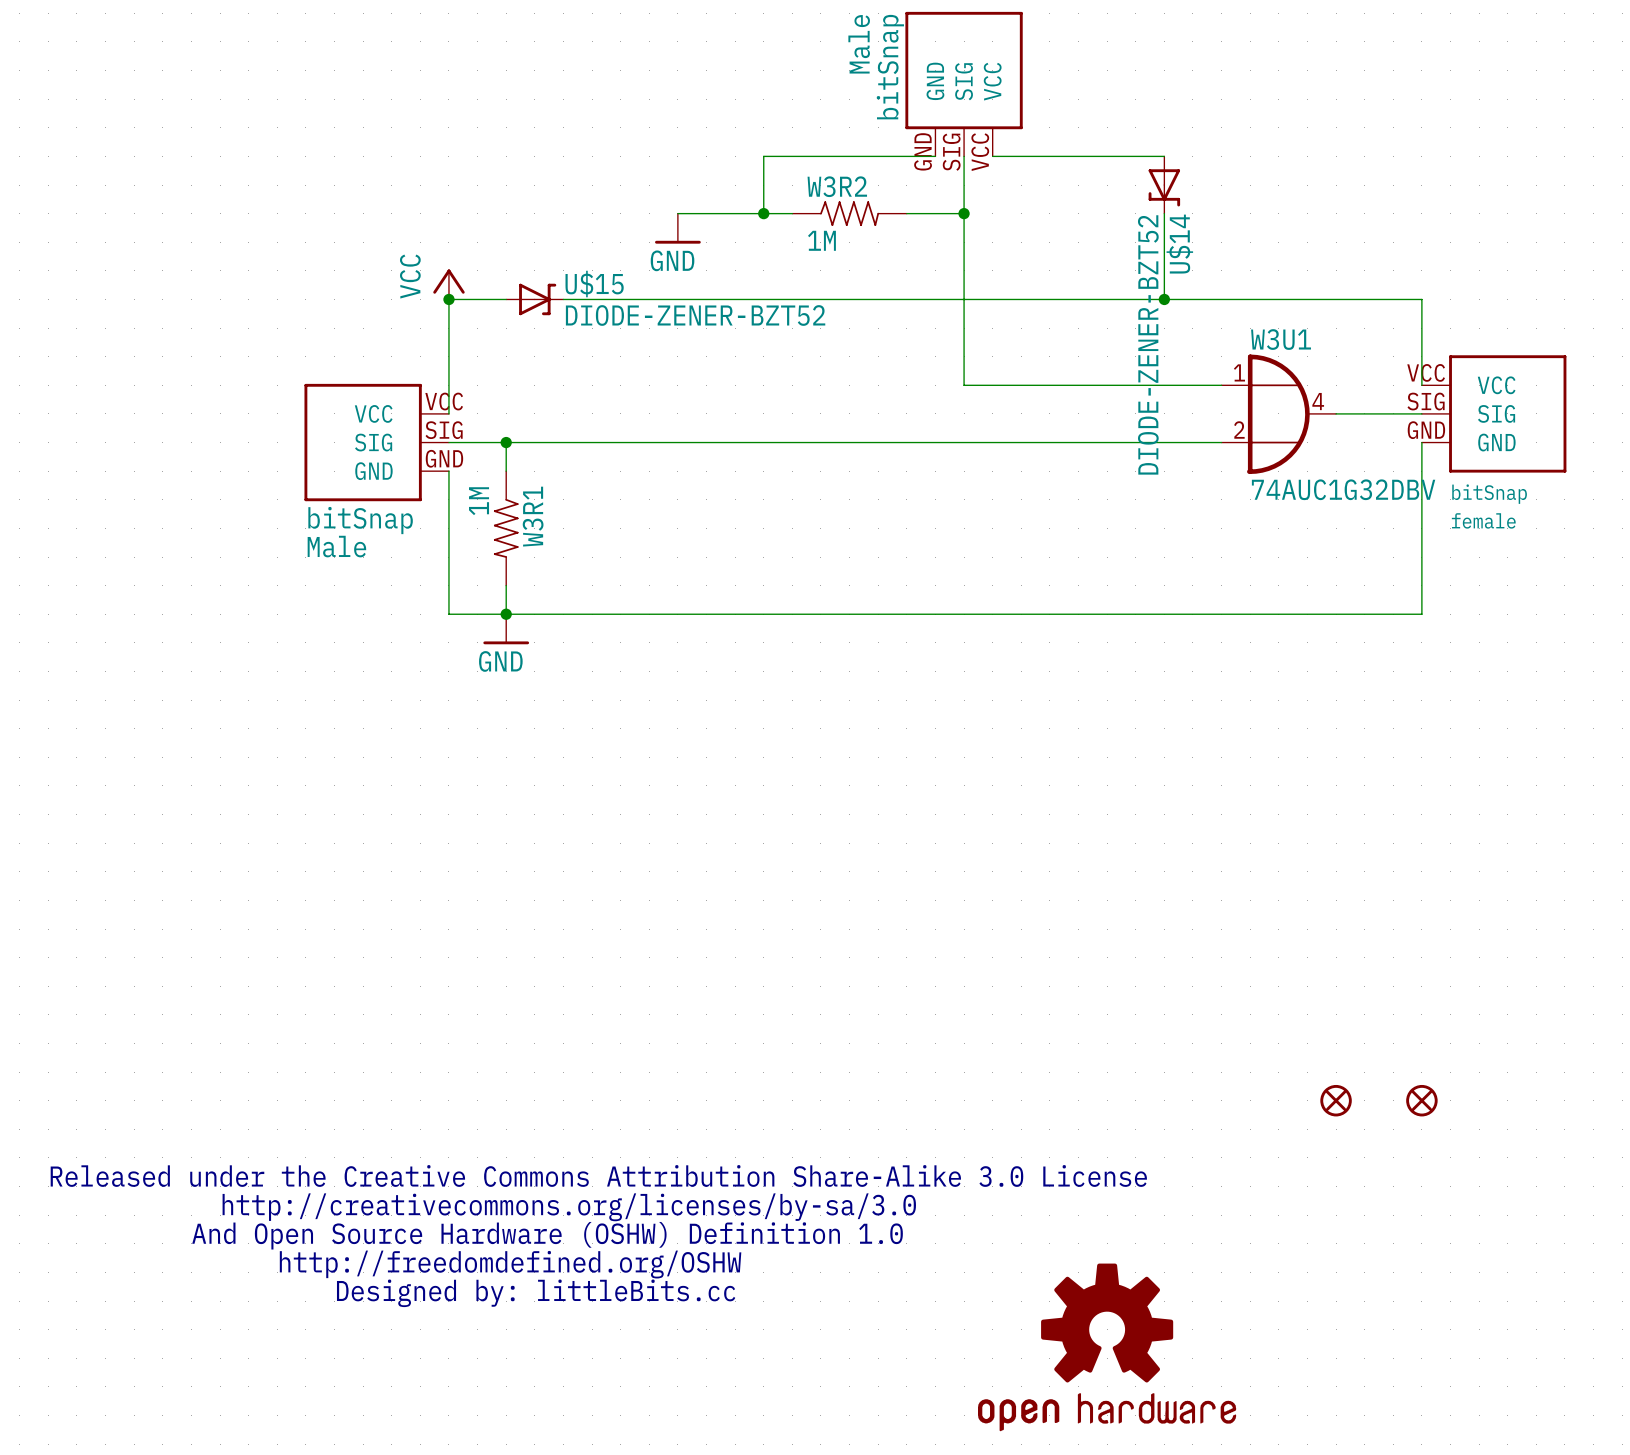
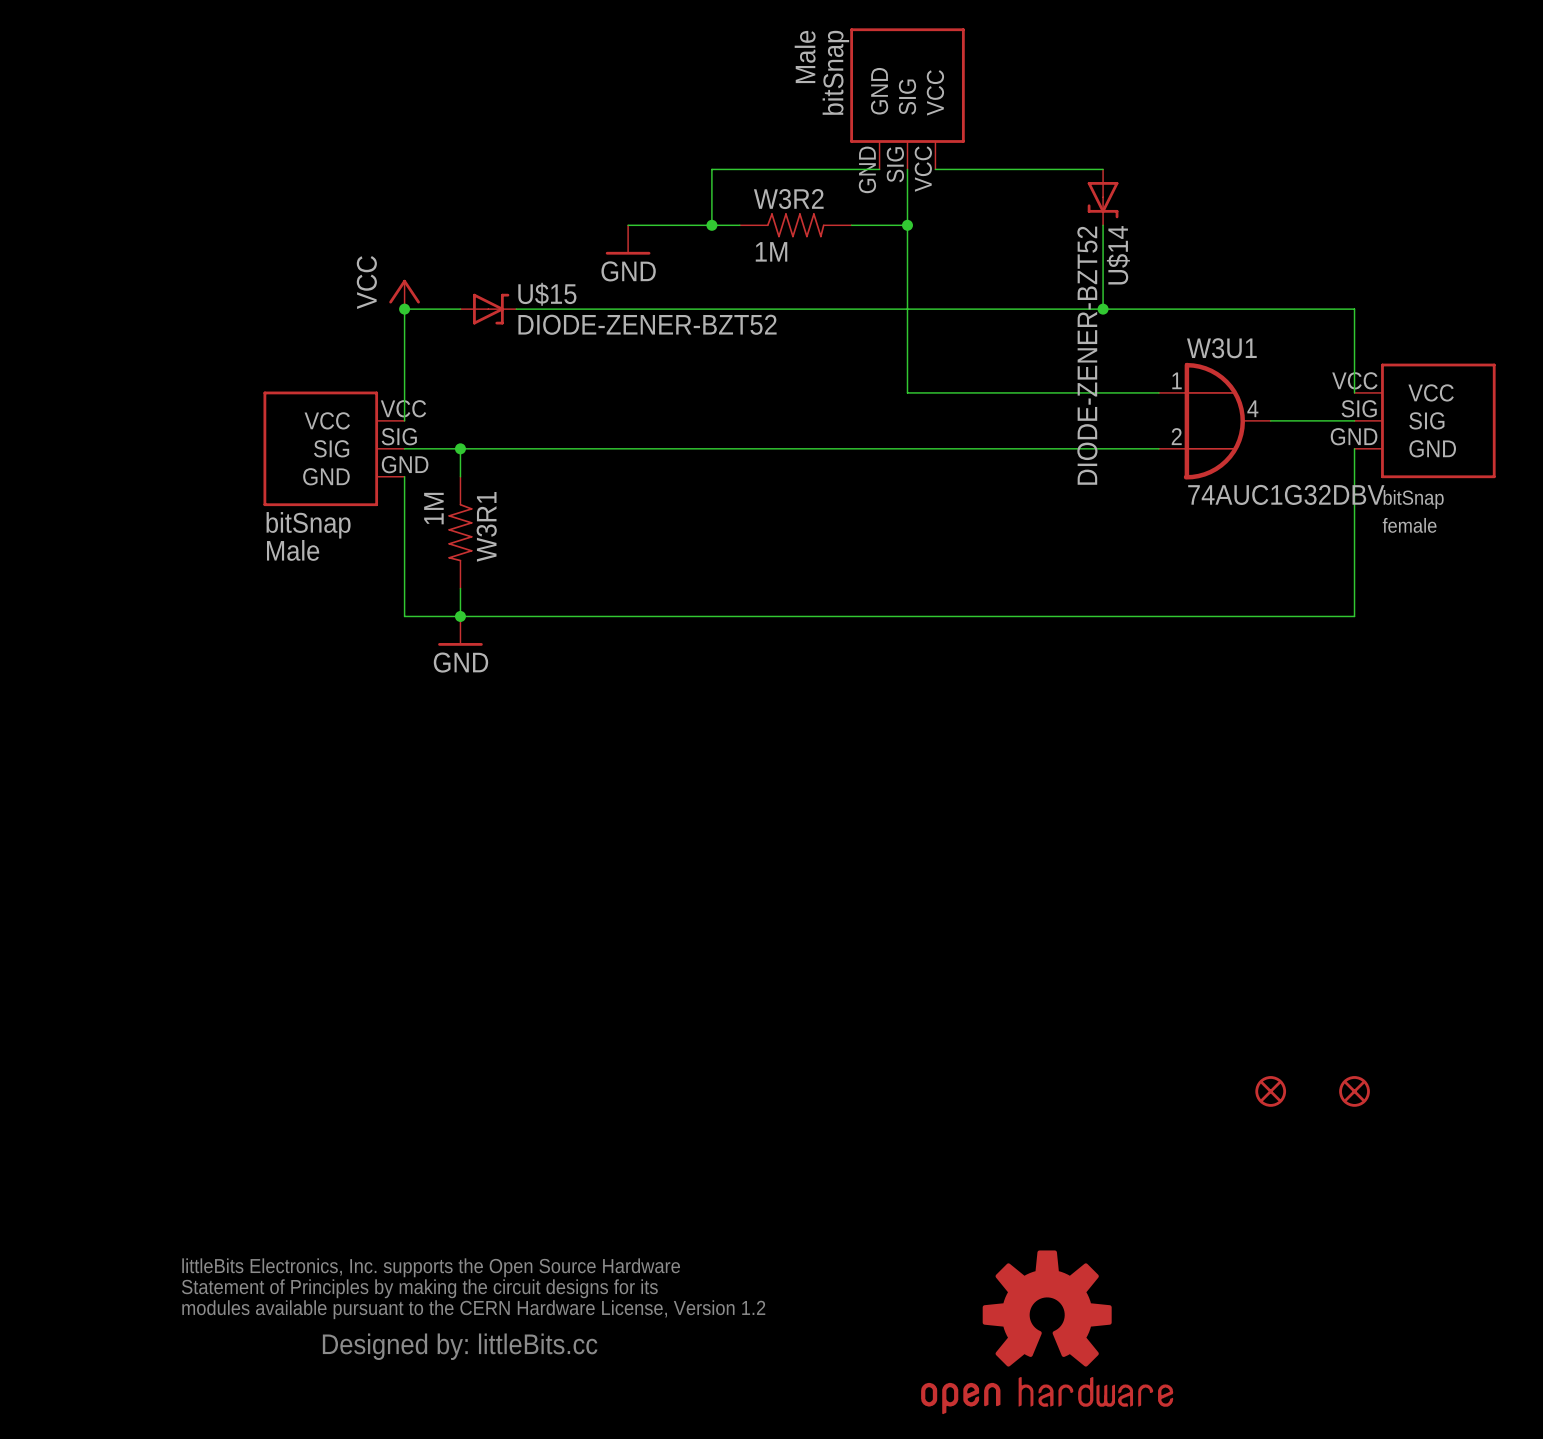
part: (598, 1236) -> none
part: none -> (473, 1309)

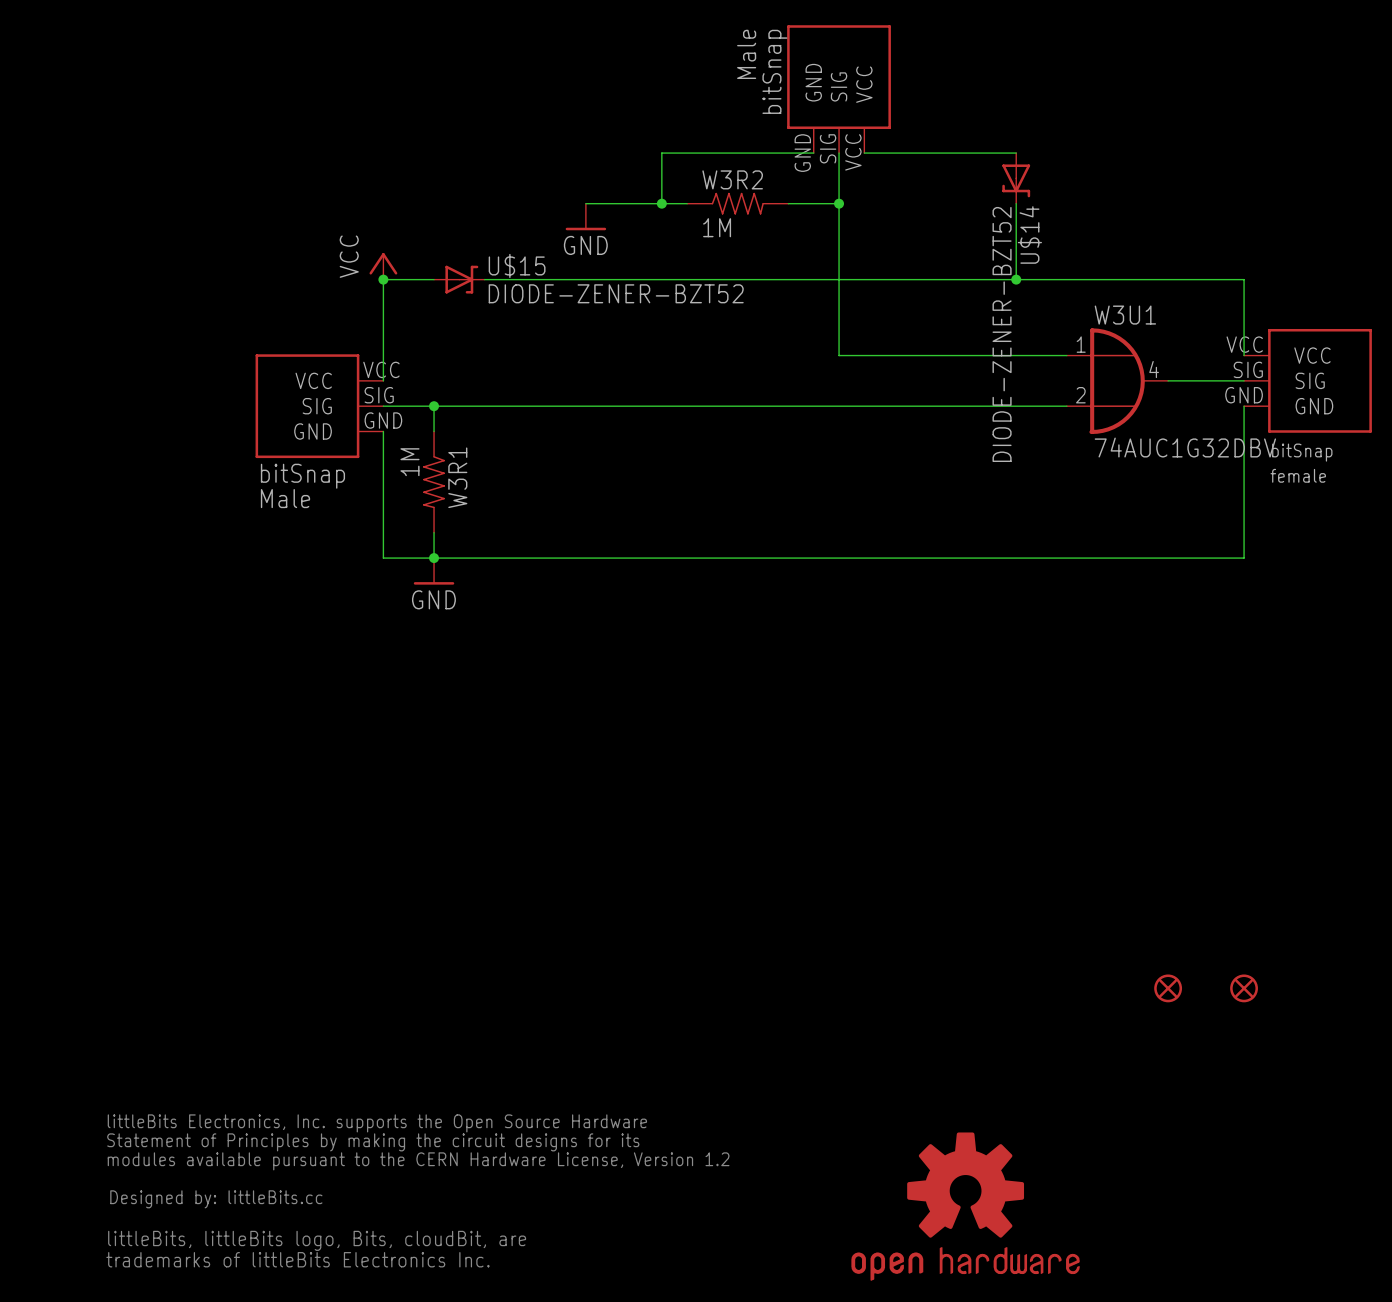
part: (473, 1309) -> none
part: none -> (417, 1190)

